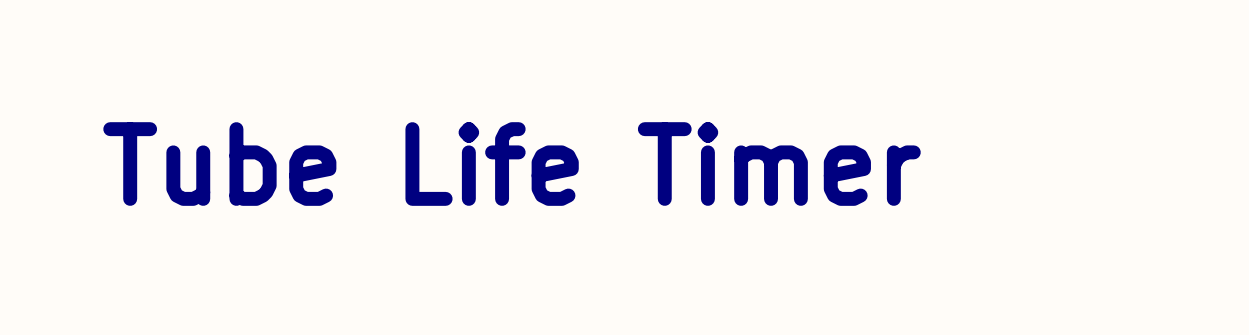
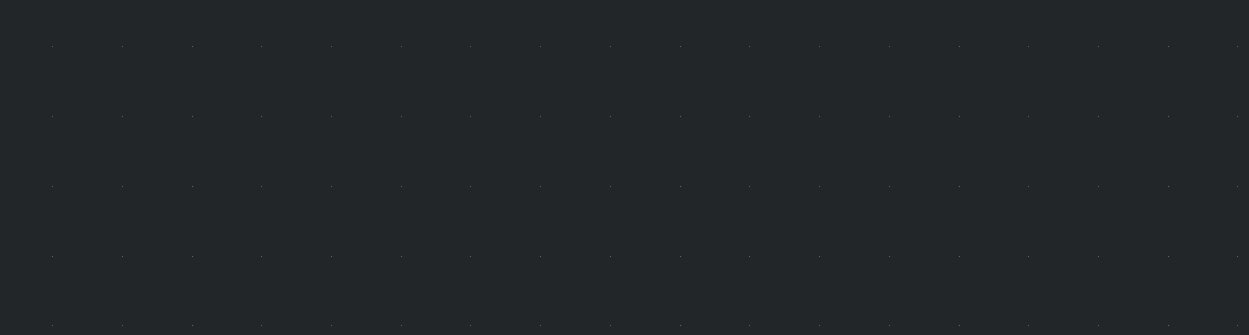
text: Tube Life Timer (512, 164) -> none

